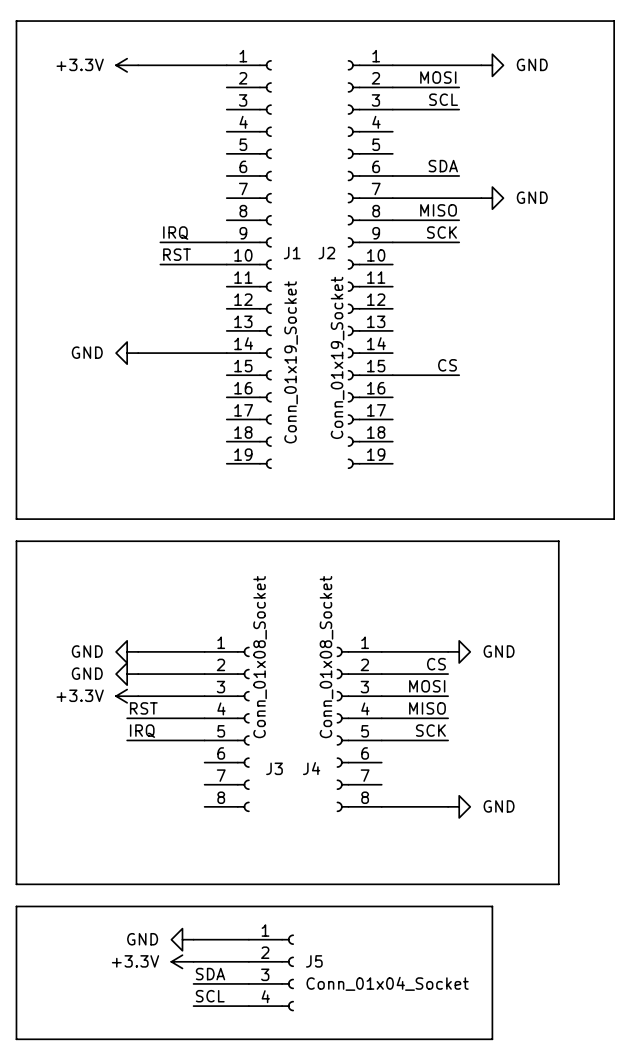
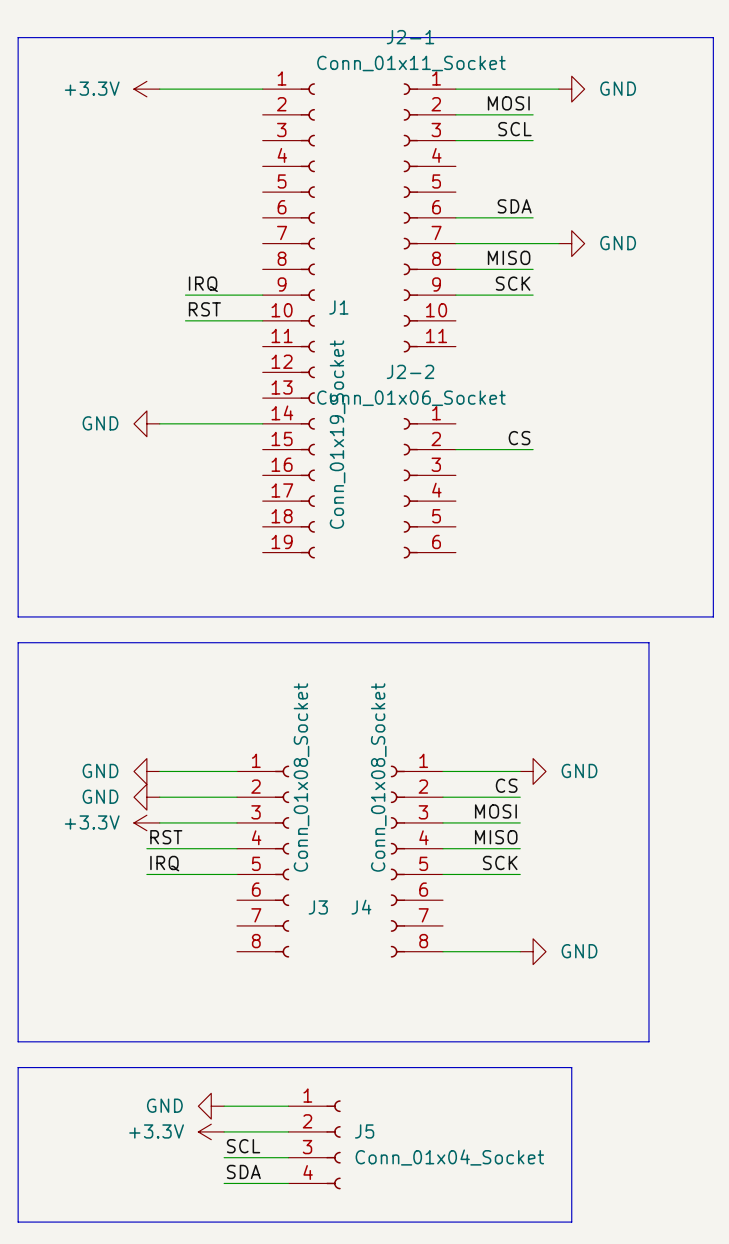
J2-1: none -> Conn_01x11_Socket (429, 217)
J2: Conn_01x19_Socket (370, 264) -> none
J2-2: none -> Conn_01x06_Socket (429, 488)
label: SDA (210, 974) -> SCL (243, 1146)
label: SCL (210, 996) -> SDA (243, 1171)

